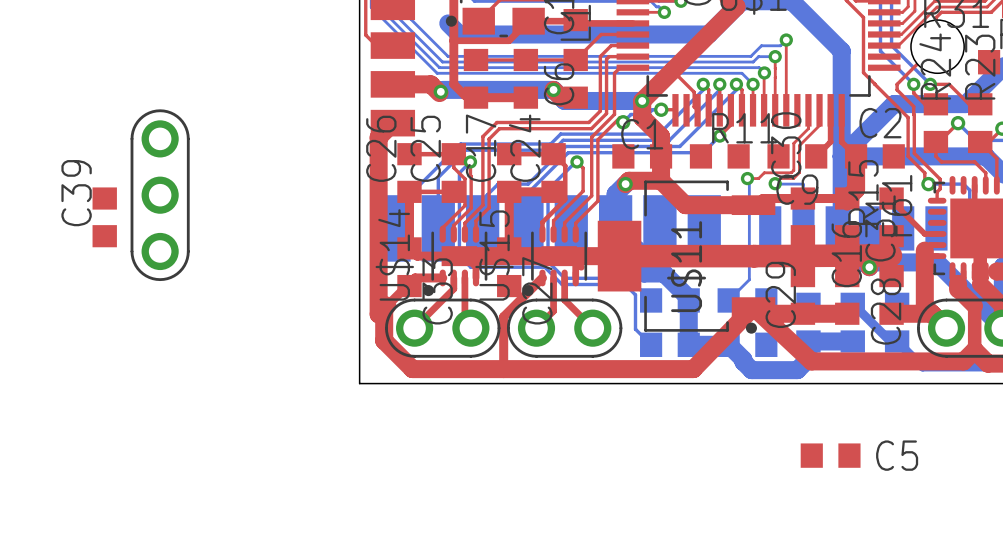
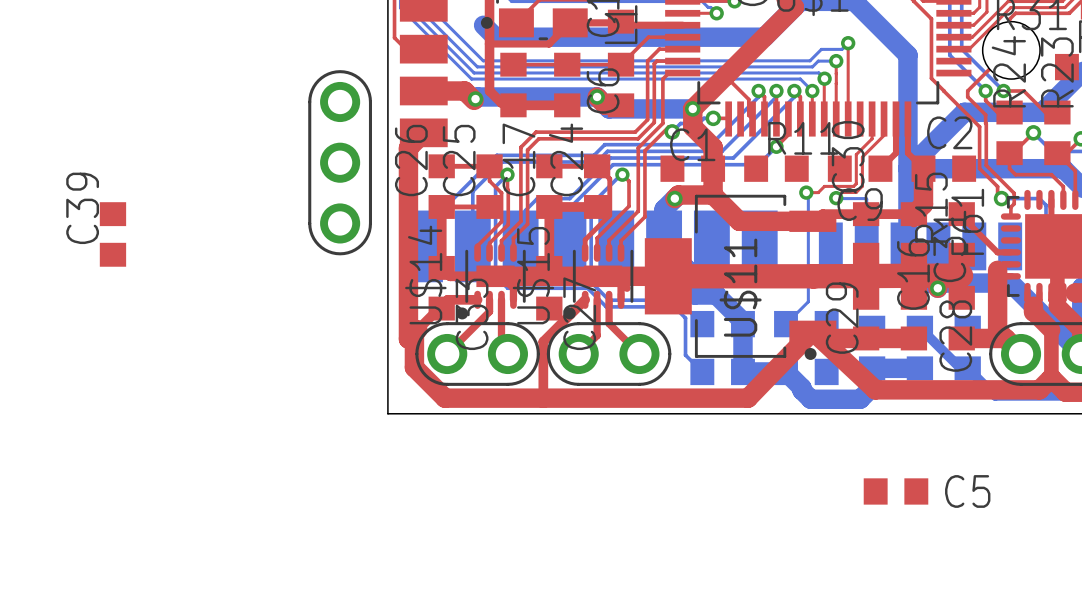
part position: (160, 195) -> (340, 162)

